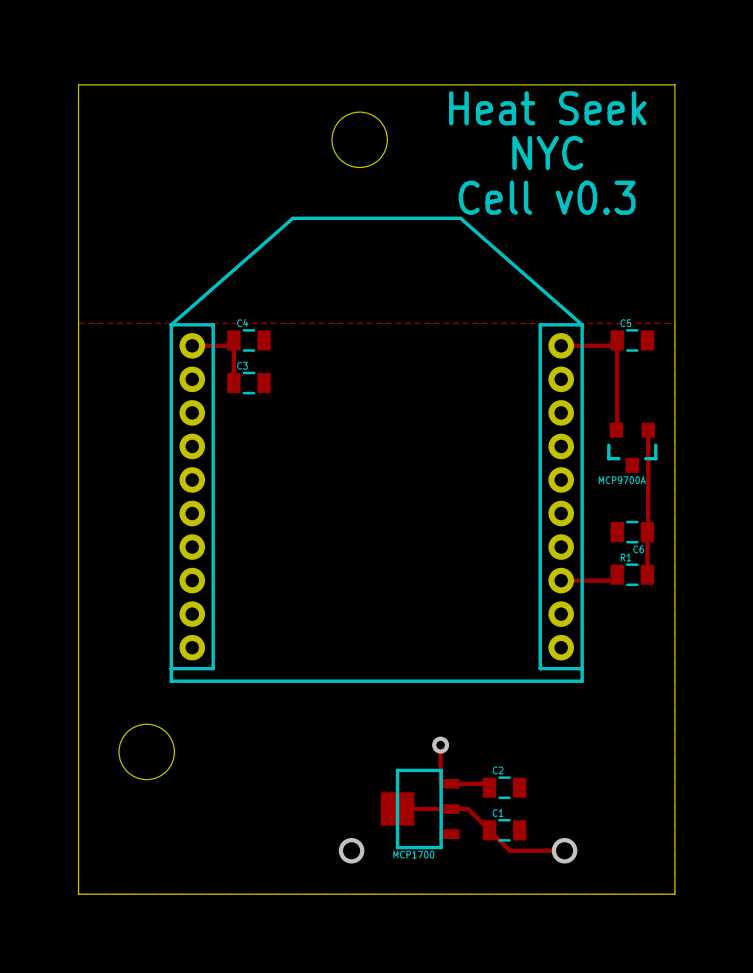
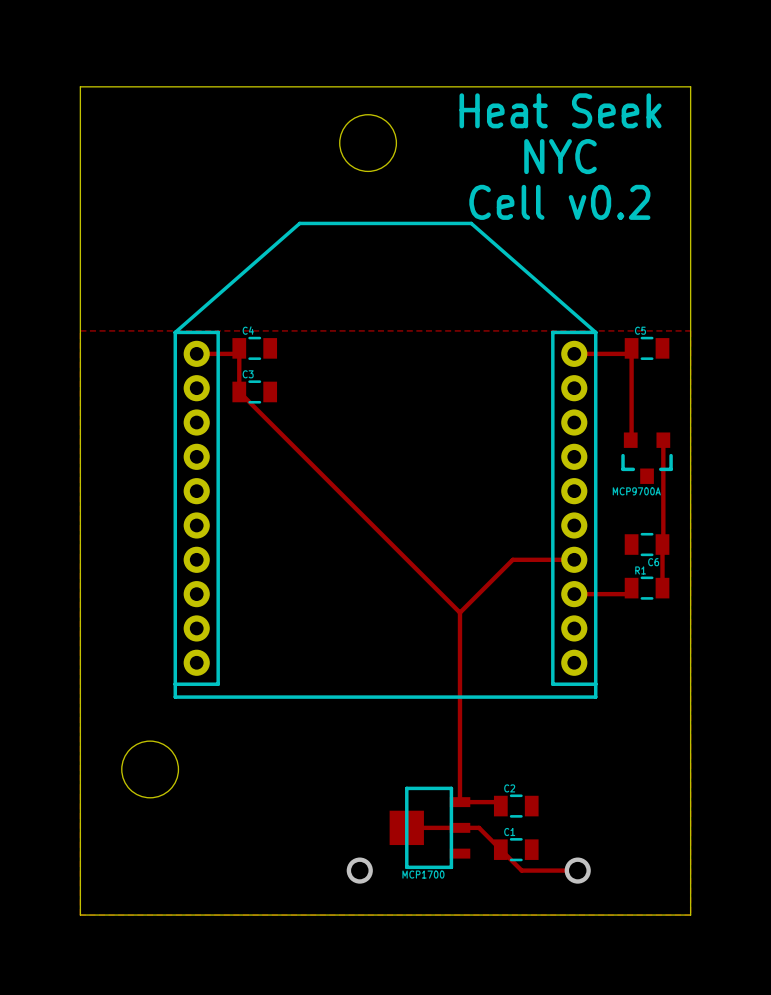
text: Cell v0.3 (547, 197) -> Cell v0.2 (559, 202)
track: none -> (239, 391) (459, 612)
track: none -> (574, 559) (512, 559) (459, 612)
track: (440, 745) (440, 783) (449, 783) -> (459, 612) (459, 802)
via: (440, 745) -> none

